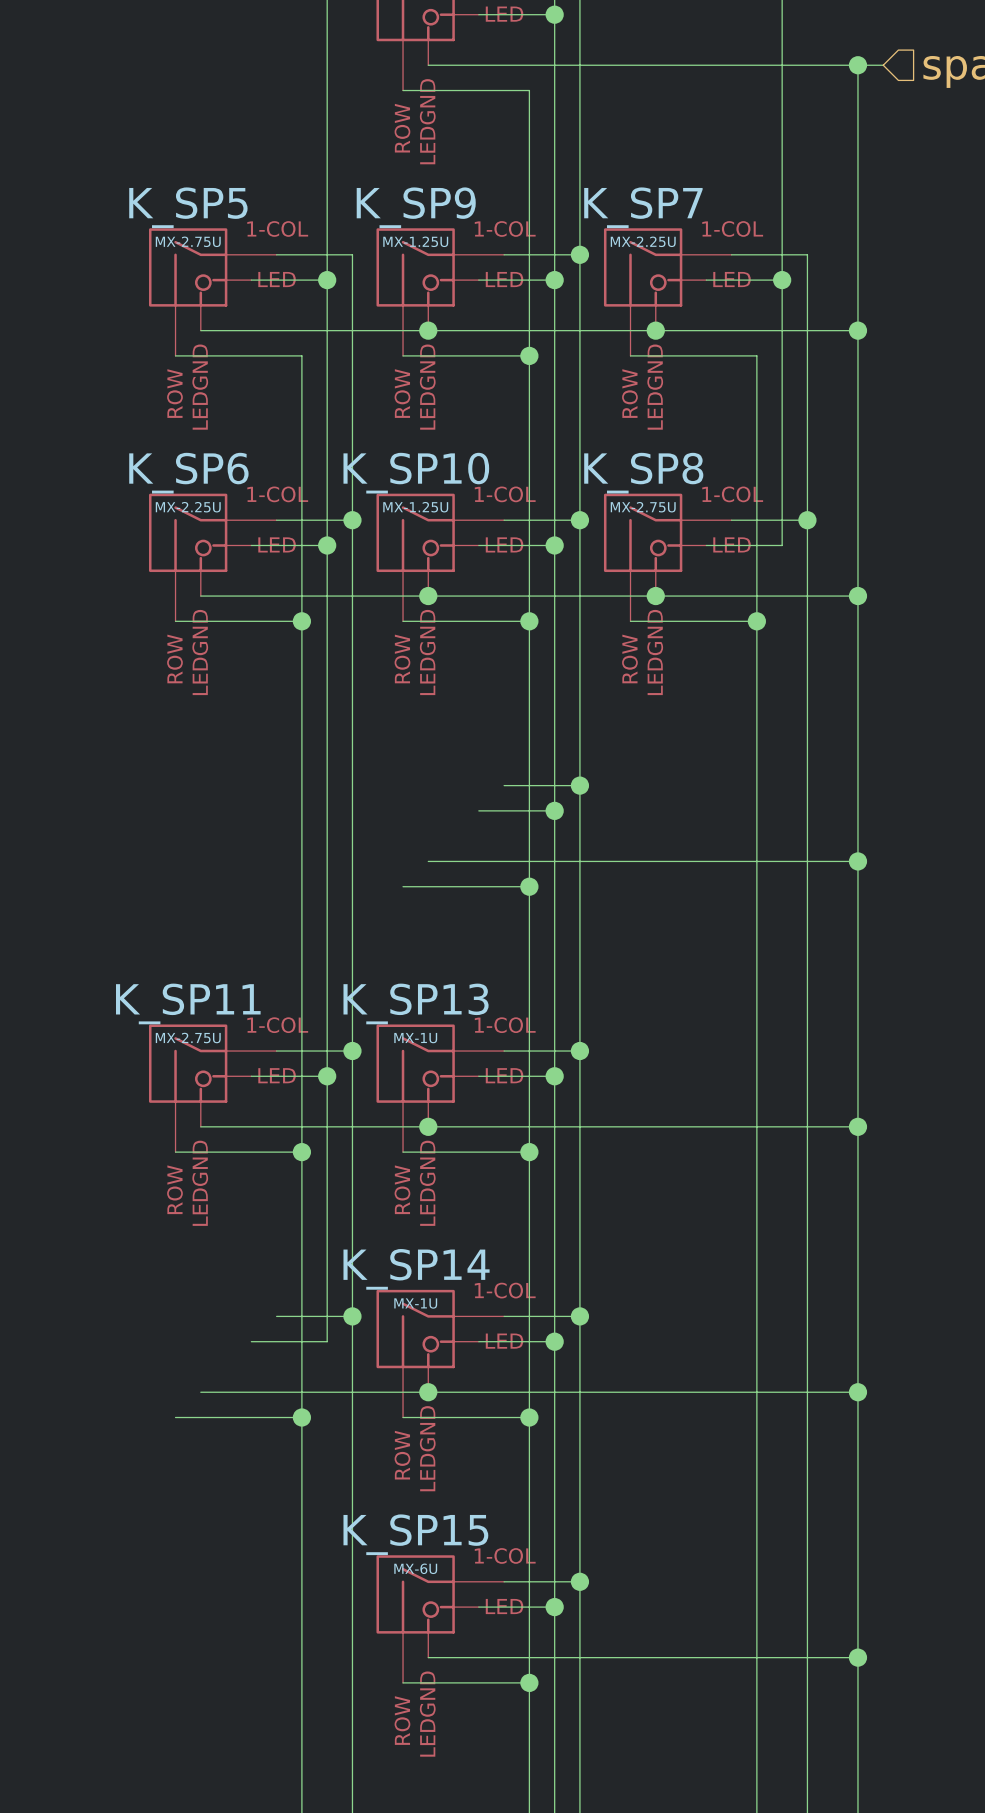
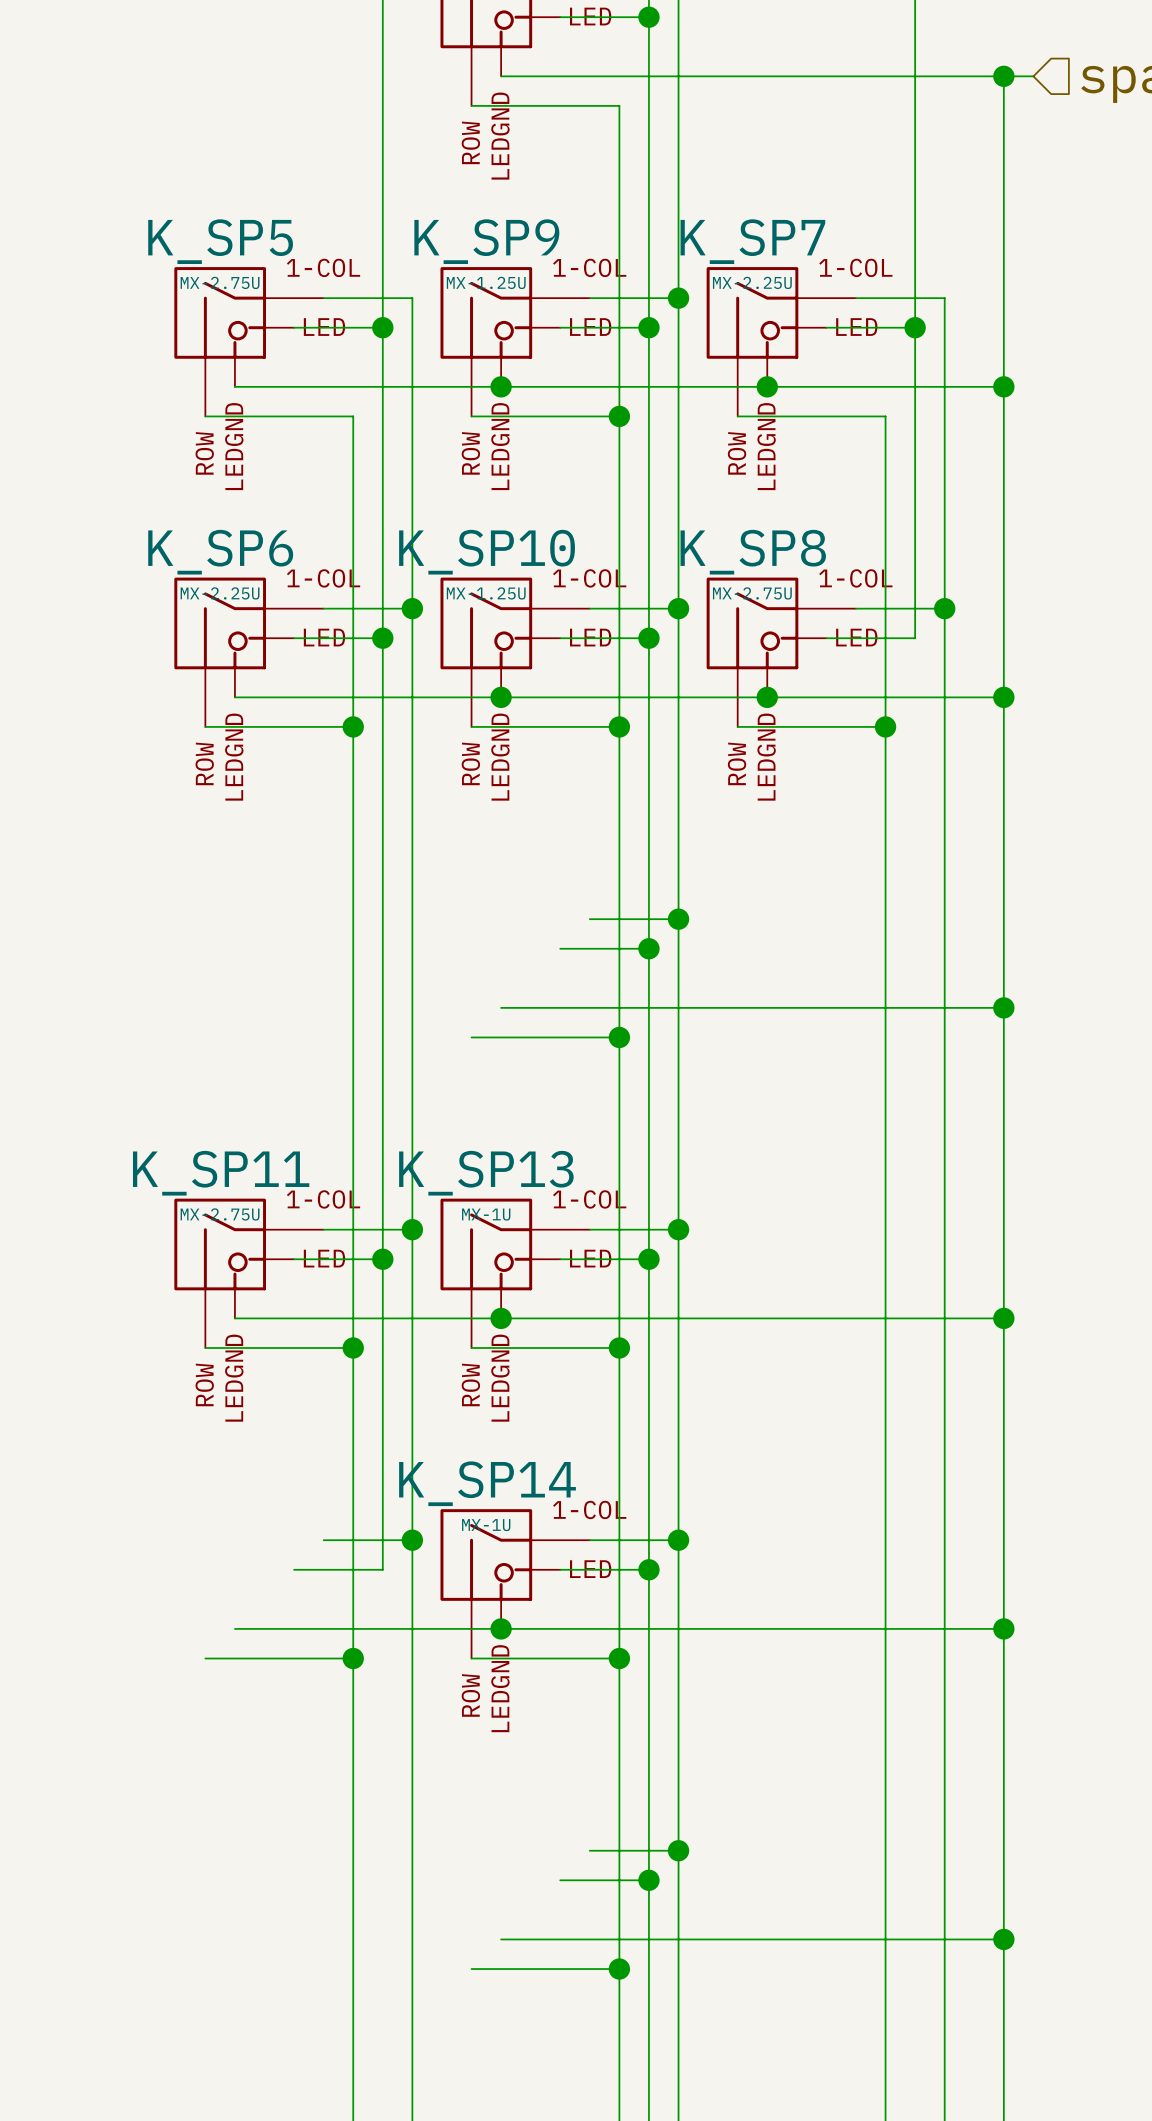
K_SP15: MX-6U (440, 1619) -> none

